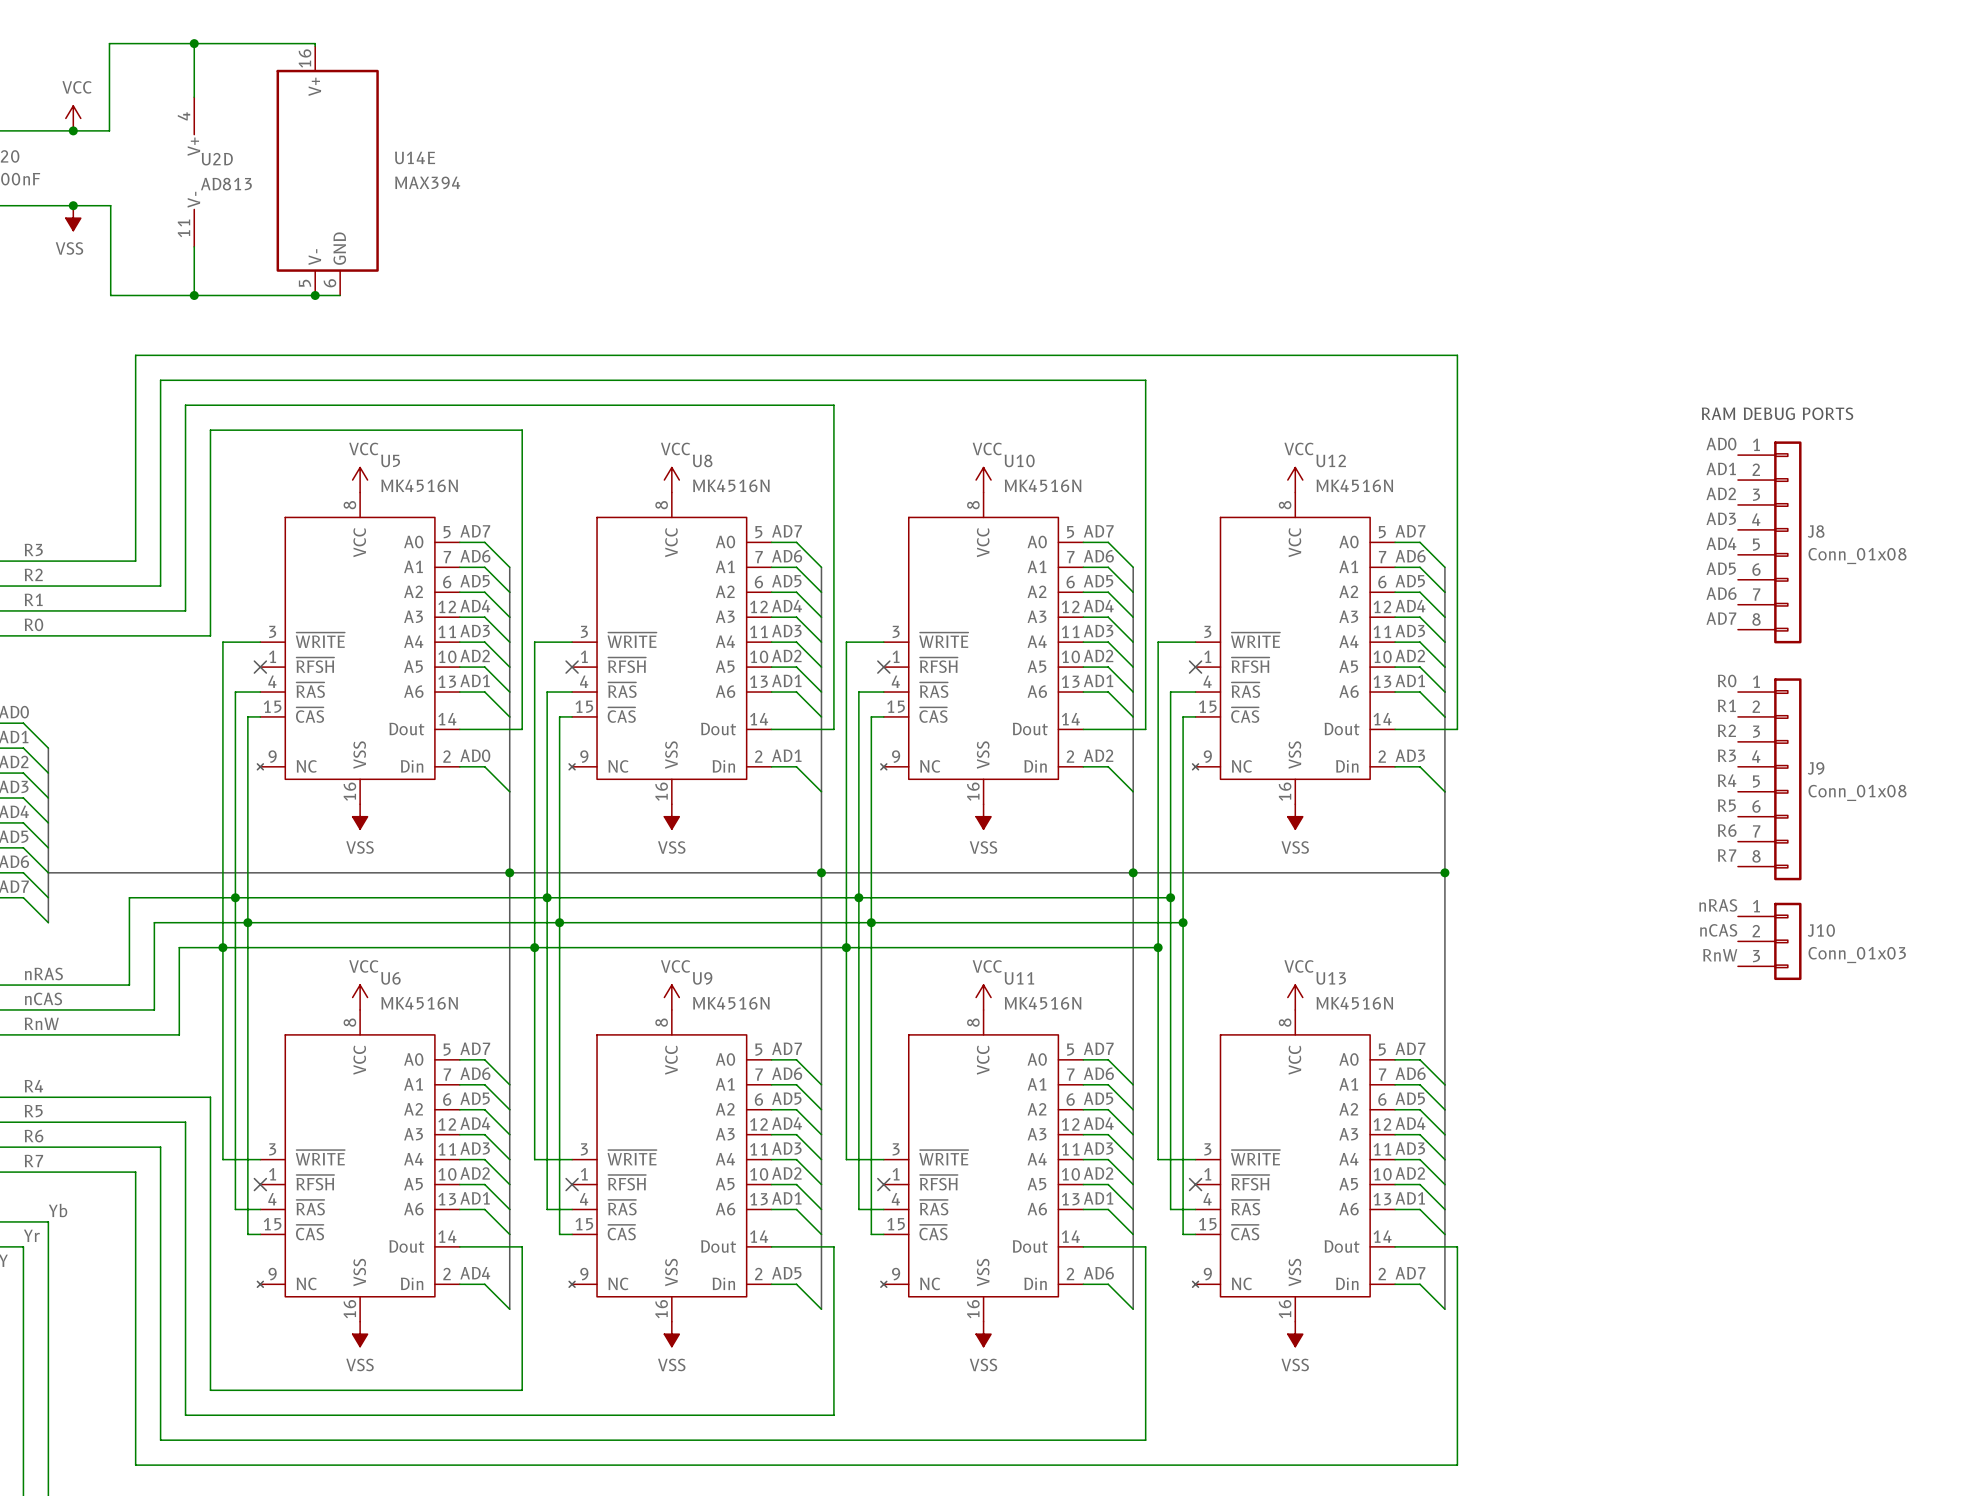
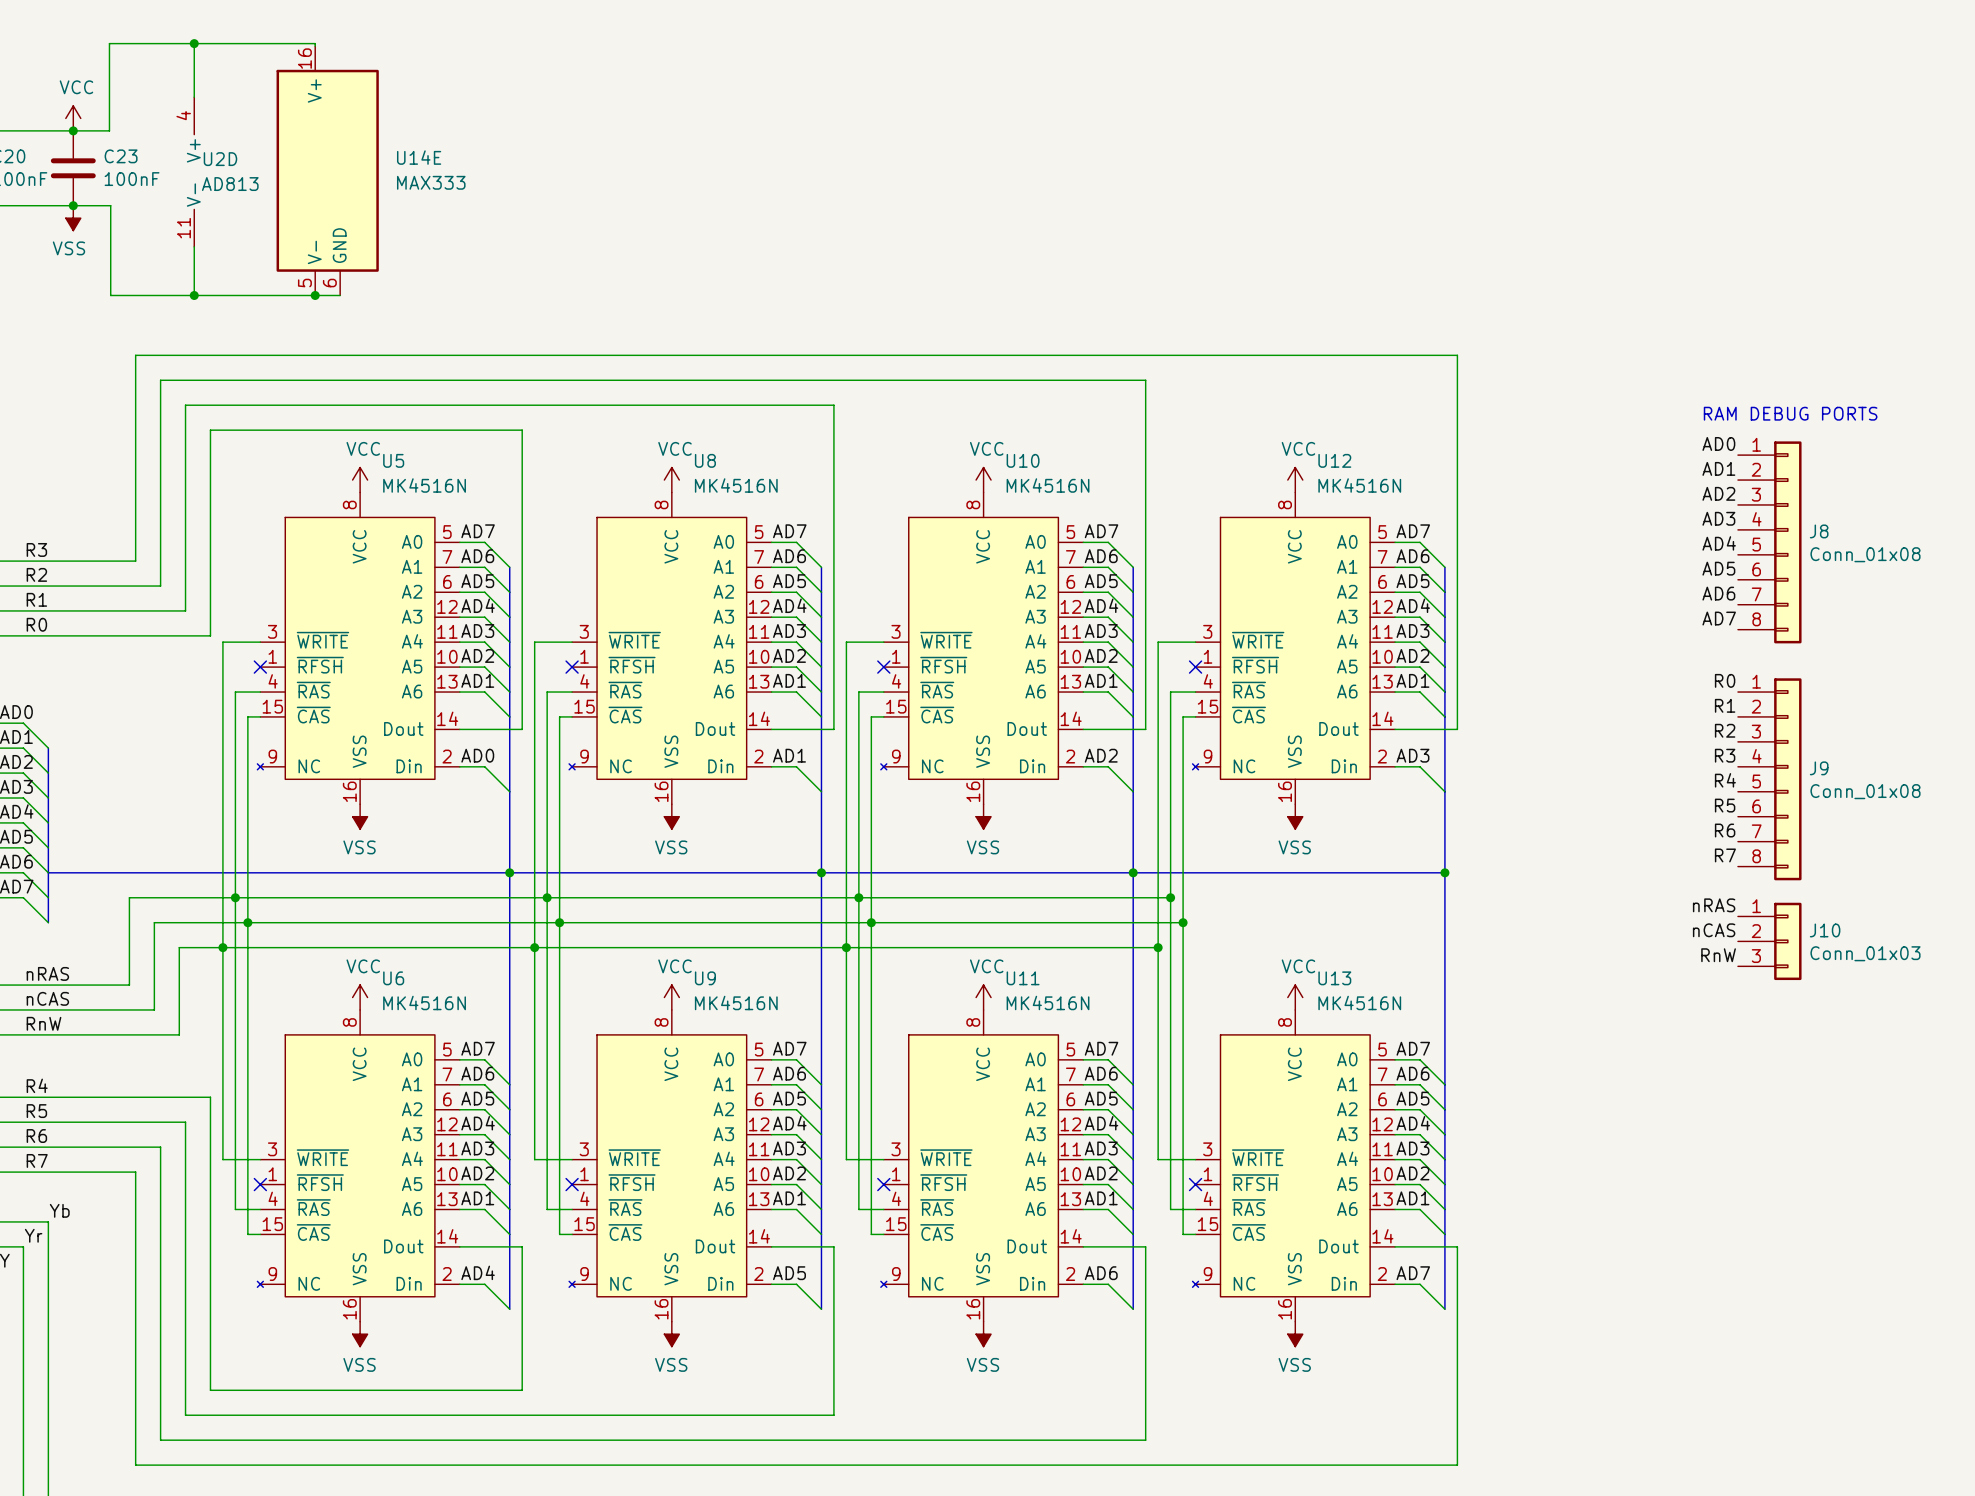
C23: none -> 100nF (73, 168)
U14E value: MAX394 (427, 182) -> MAX333 (431, 182)

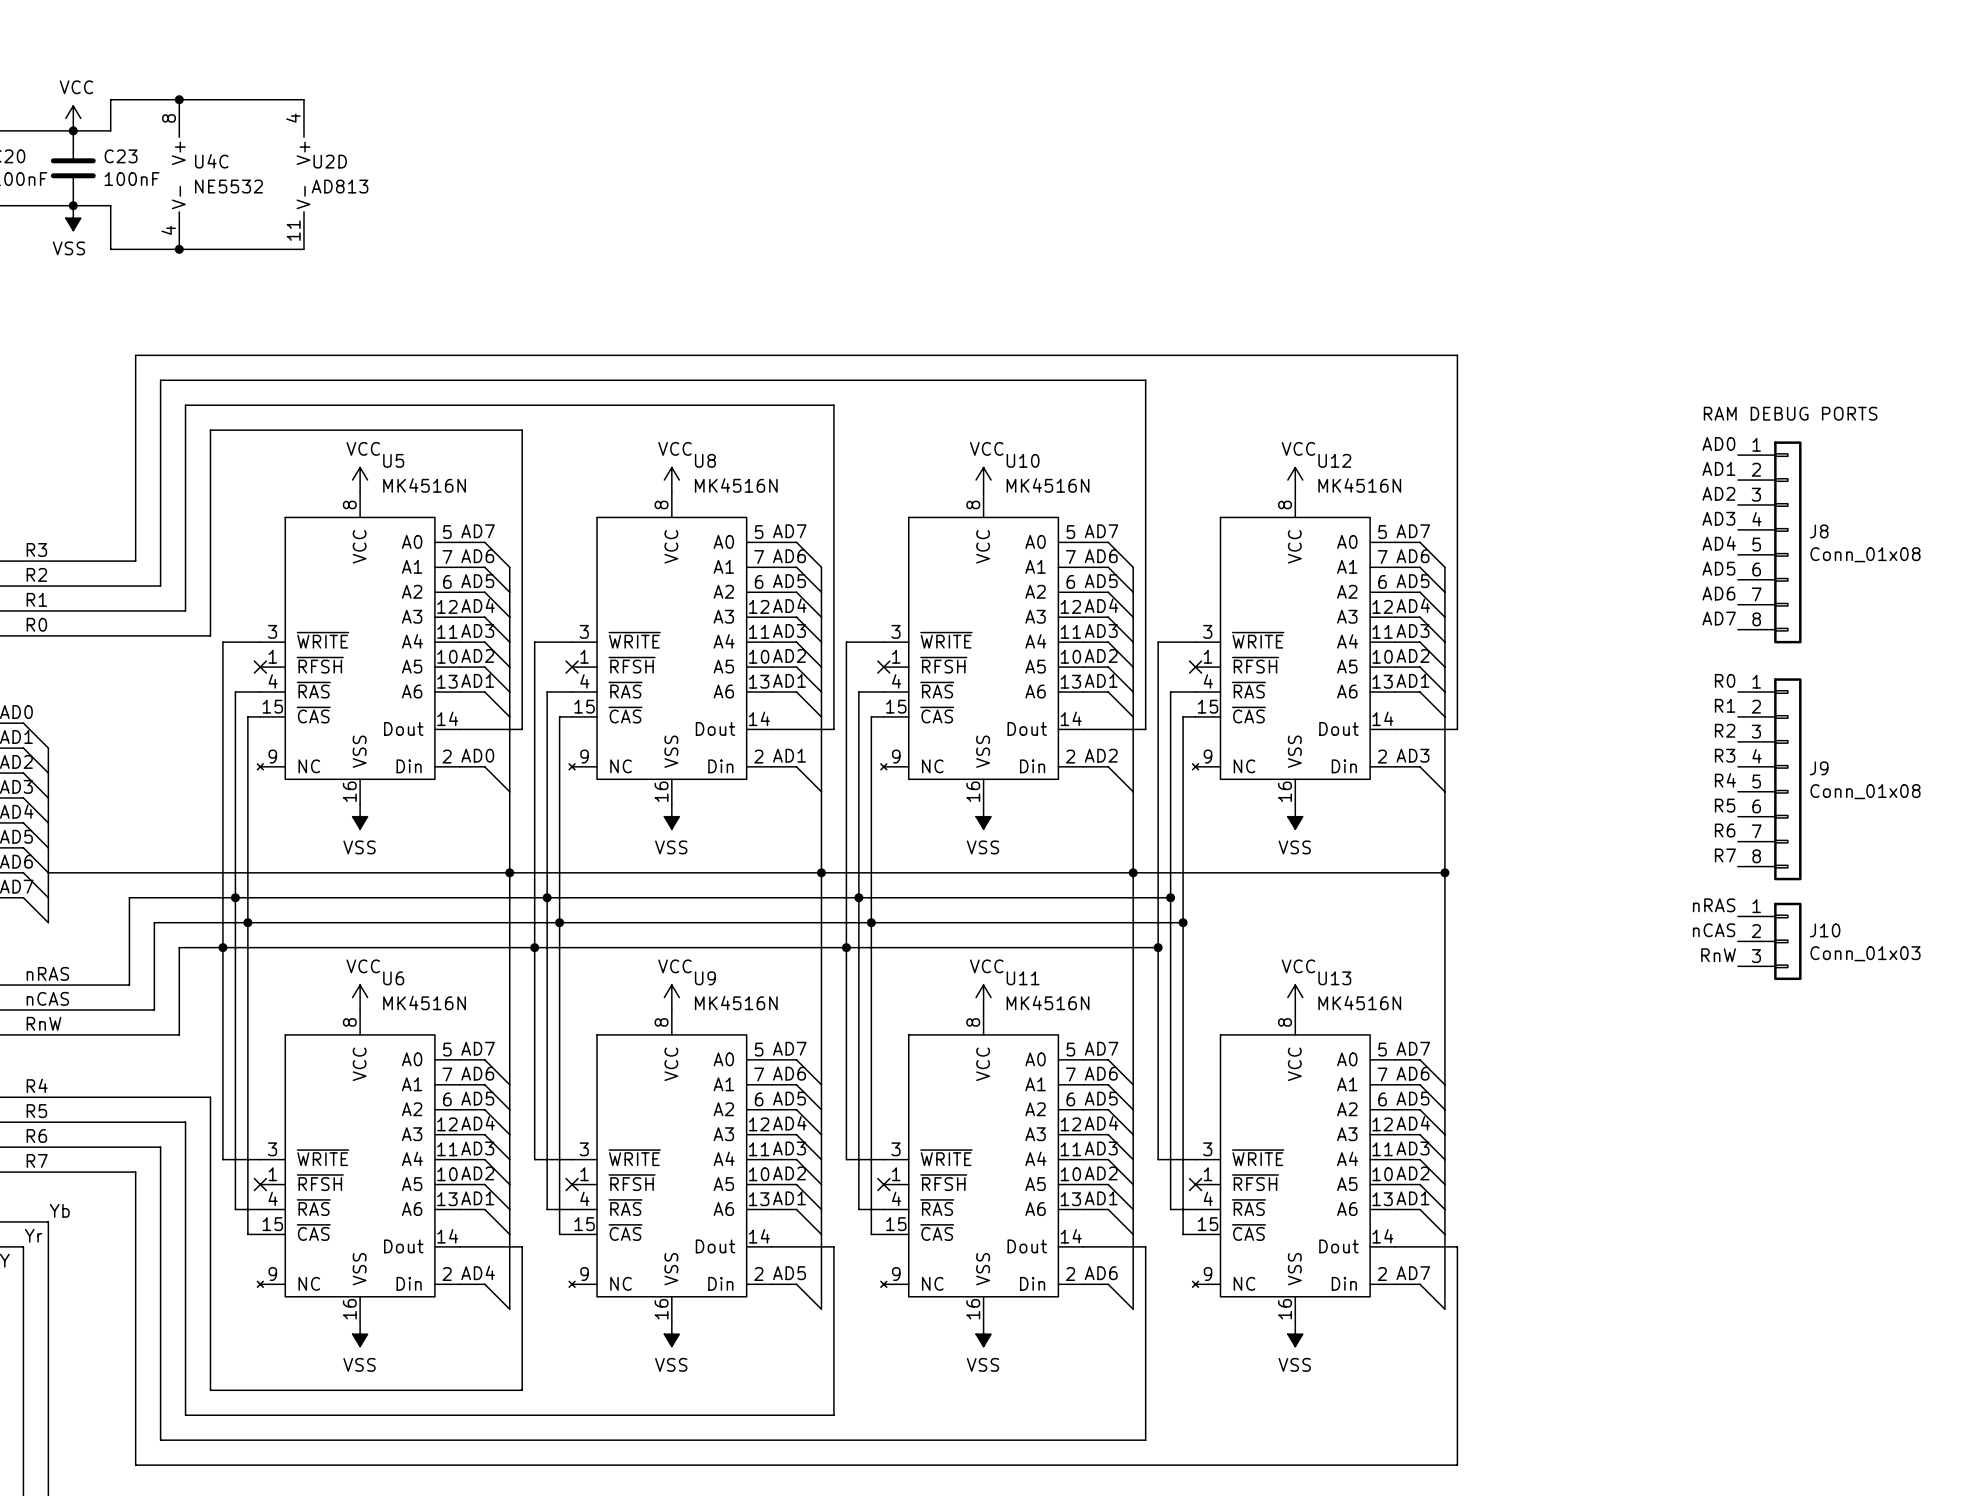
wire: (194, 43) (194, 97) -> none
junction position: (194, 43) -> (179, 99)
wire: (315, 46) (315, 43) (109, 43) (109, 130) -> (303, 99) (110, 99) (109, 130)
U14E: MAX333 (327, 170) -> none
U2D position: (194, 172) -> (303, 174)
U4C: none -> NE5532 (179, 174)
wire: (194, 246) (194, 295) -> none
wire: (110, 249) (110, 295) (340, 295) -> (110, 249) (303, 249)
junction position: (194, 295) -> (179, 249)
junction: (315, 295) -> none

